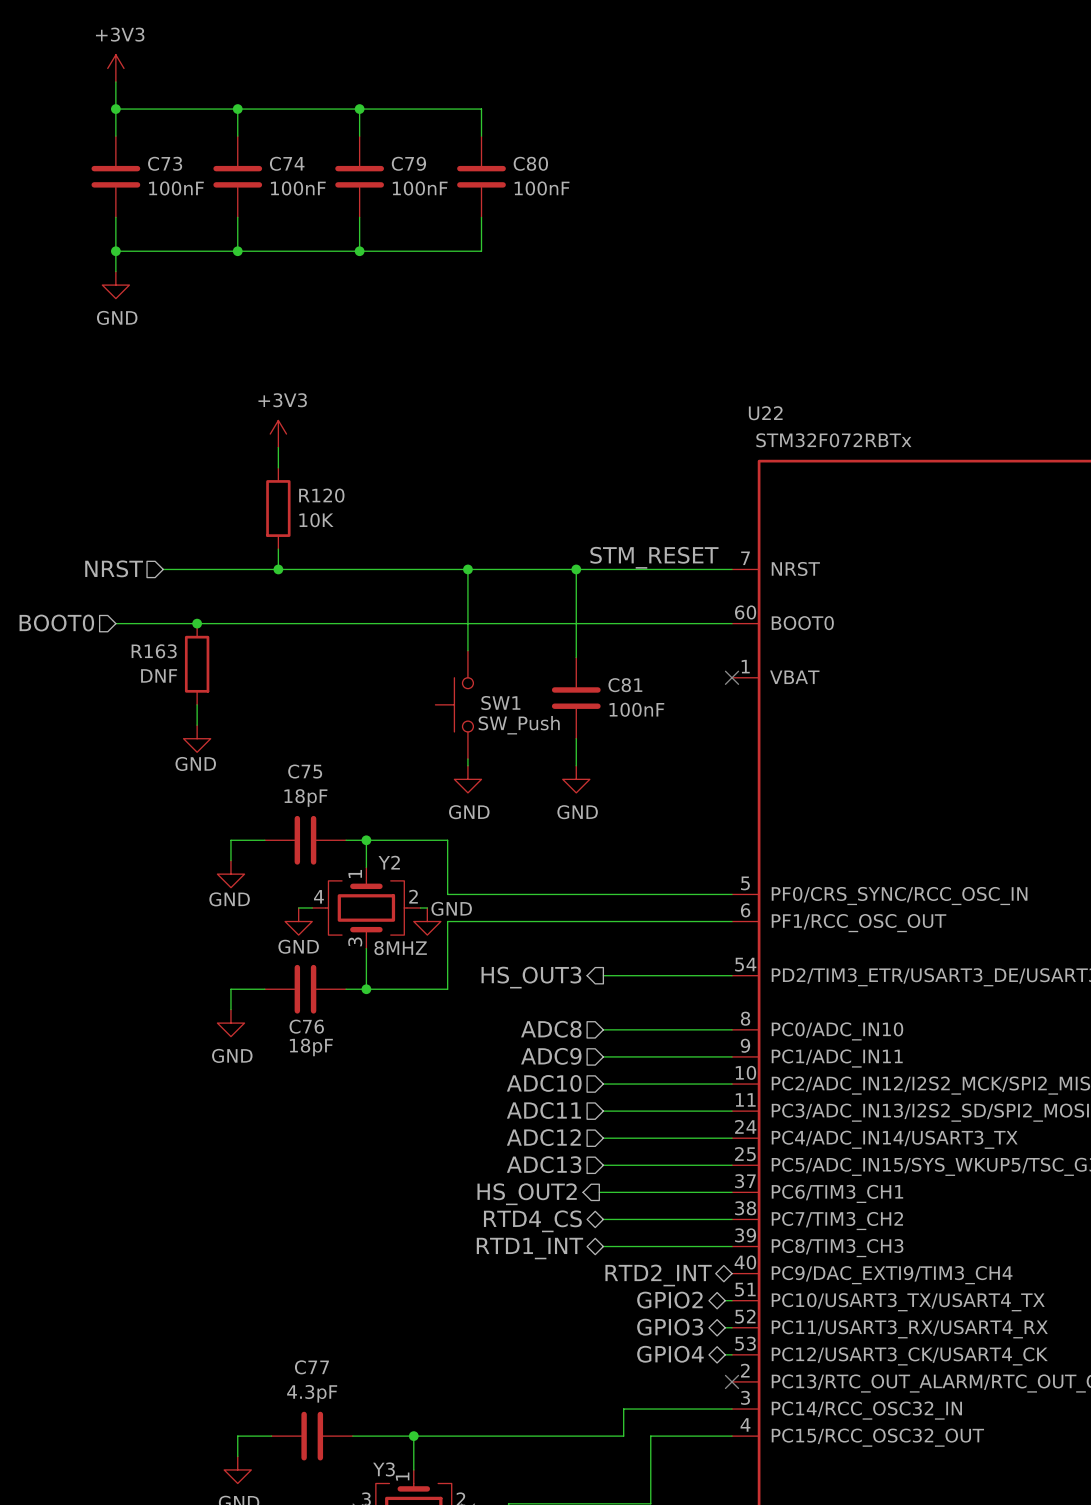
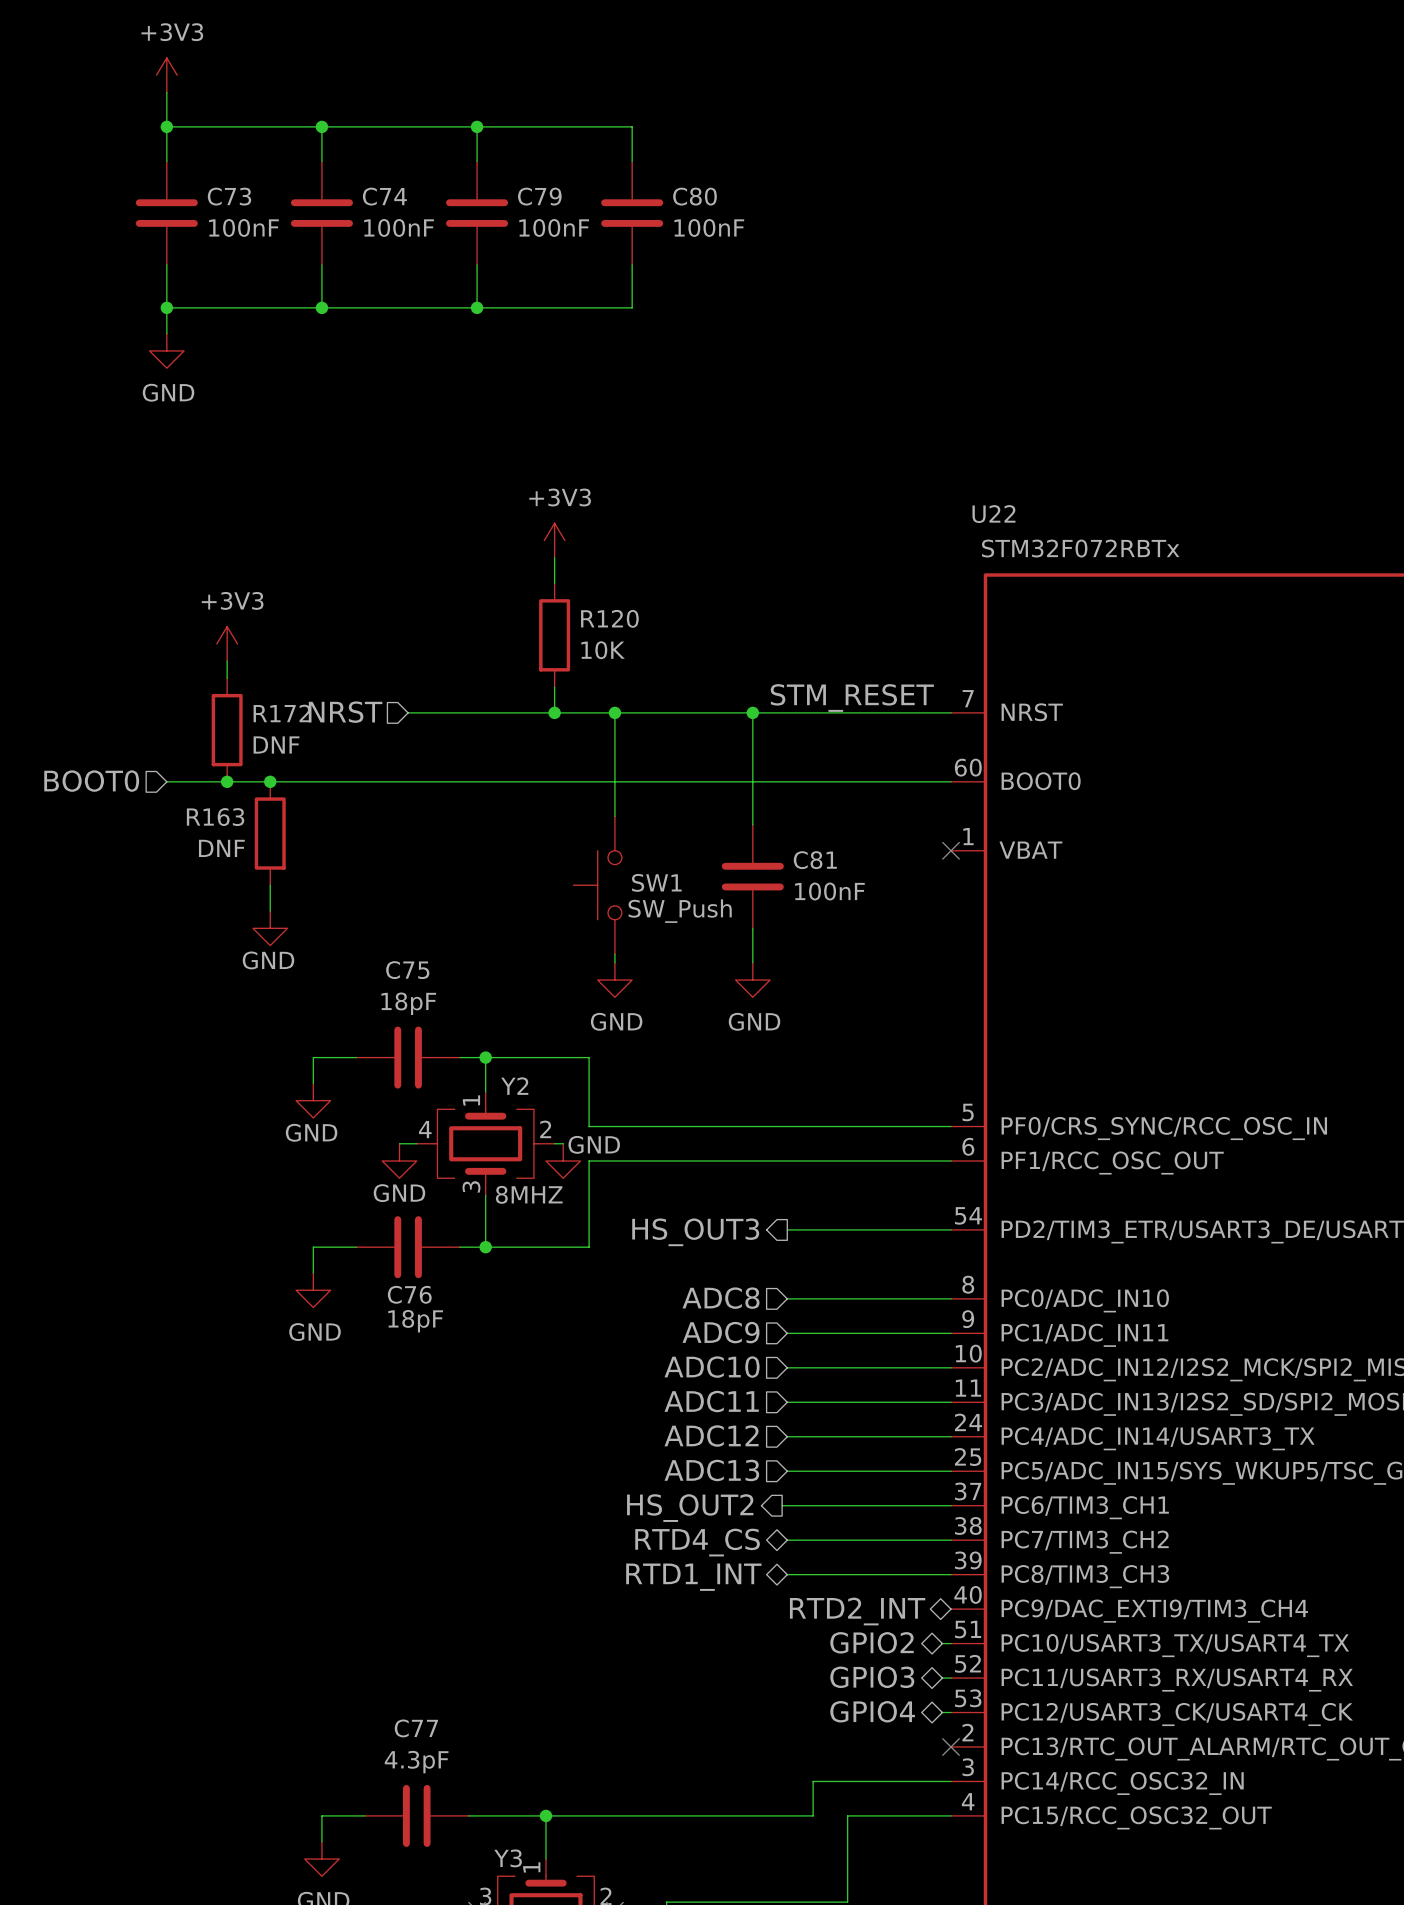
power symbol: +3V3 (278, 434) -> none
power symbol: none -> +3V3 (554, 540)
wire: (278, 447) (278, 467) -> (554, 557) (554, 583)
R120 position: (278, 508) -> (554, 635)
power symbol: none -> +3V3 (227, 643)
wire: none -> (227, 661) (227, 678)
wire: (278, 549) (278, 569) -> (554, 687) (554, 712)
hierarchical label position: NRST (114, 568) -> NRST (345, 712)
wire: (163, 569) (305, 569) -> none
junction: (278, 569) -> none
junction: none -> (554, 712)
R172: none -> DNF (227, 730)
junction: none -> (227, 781)

